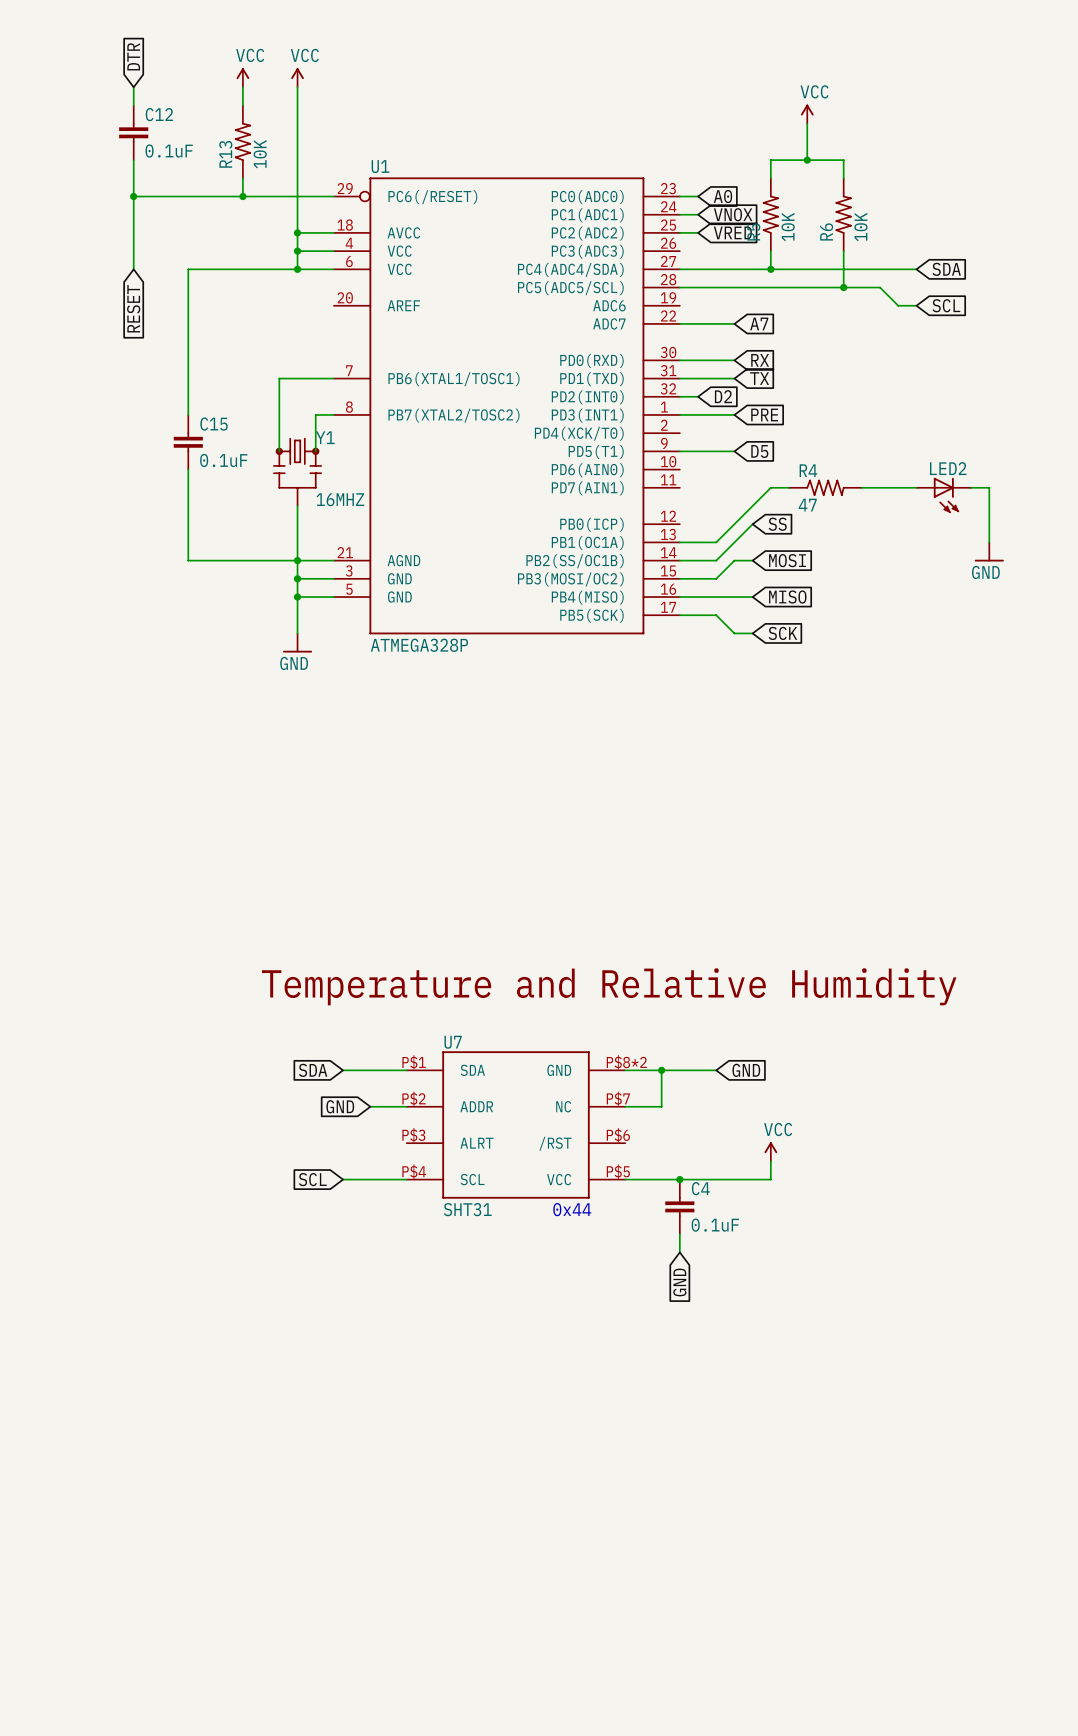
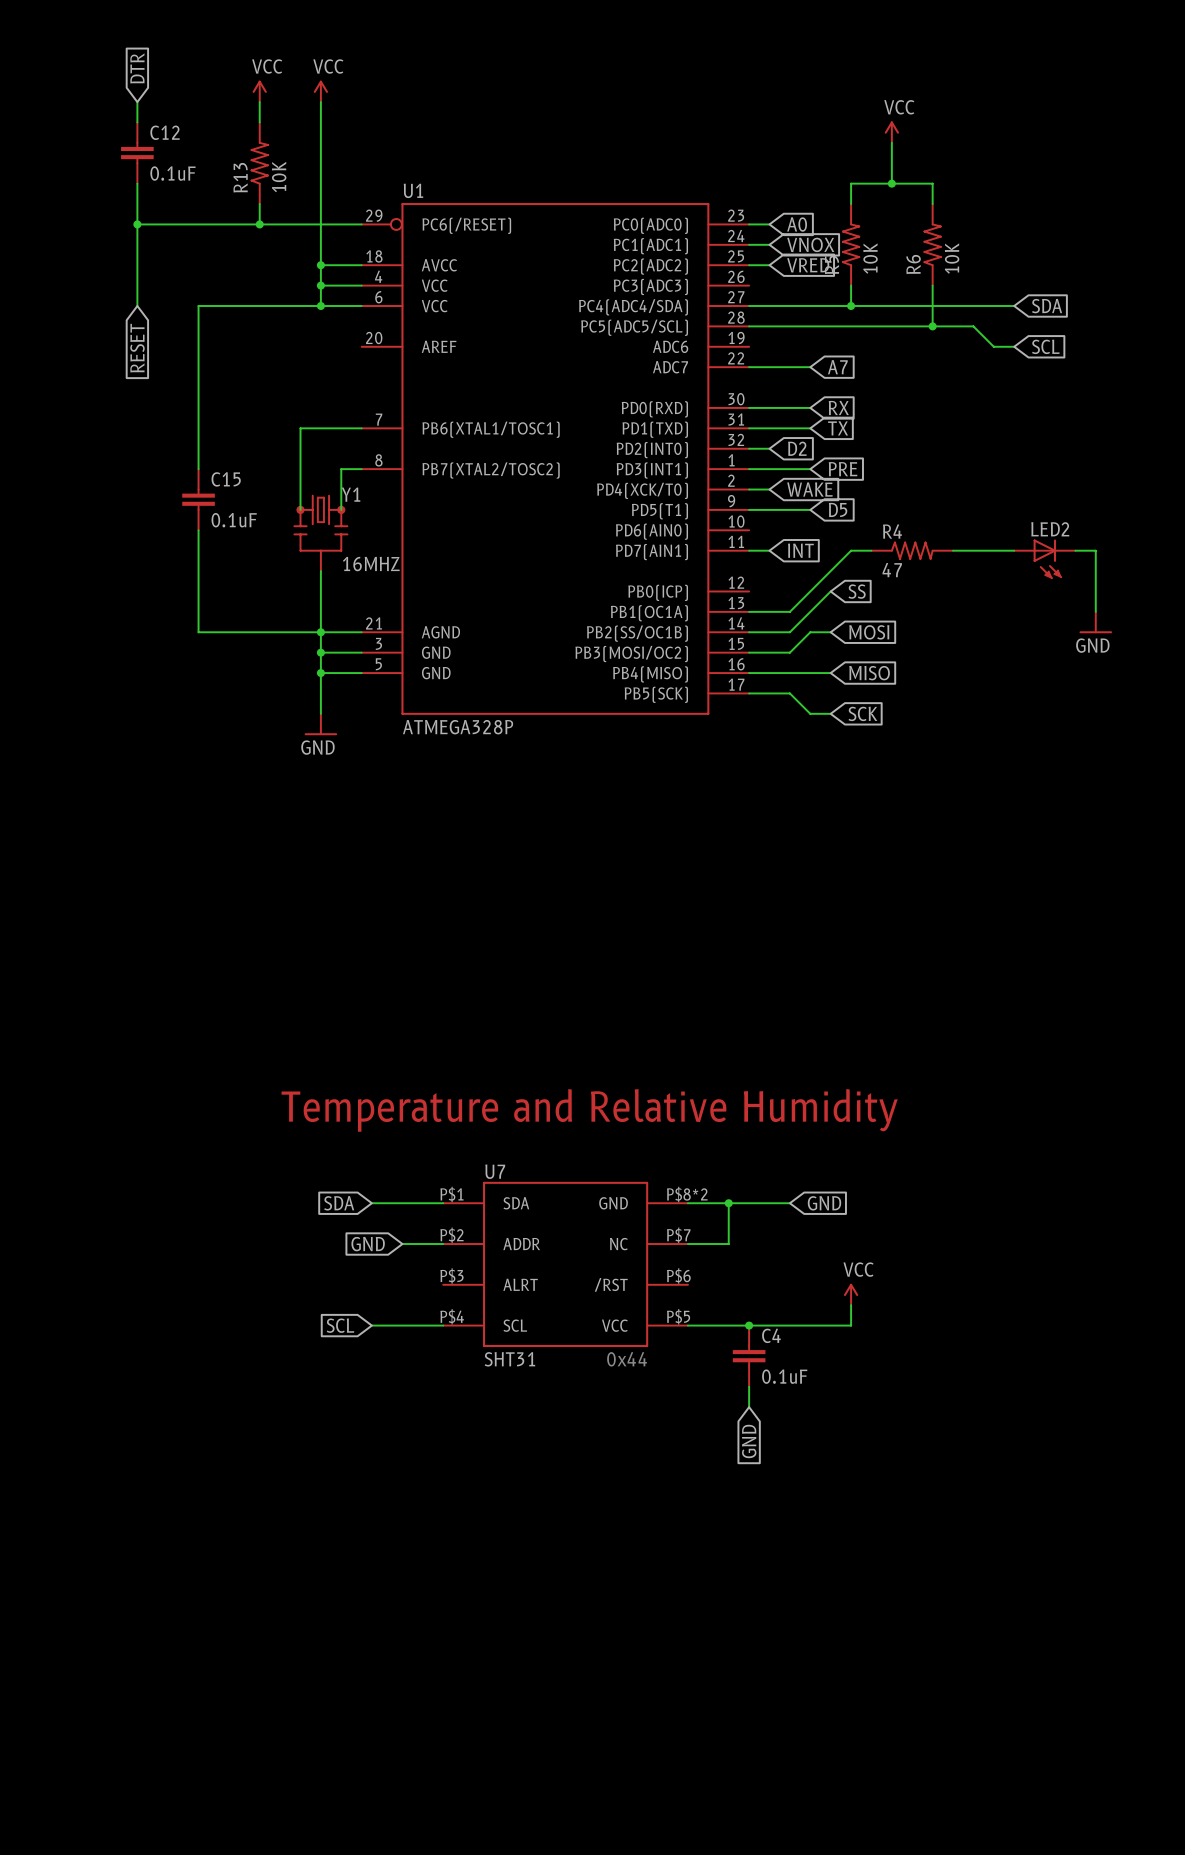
wire: none -> (749, 489) (769, 489)
global label: none -> WAKE (809, 489)
wire: none -> (749, 550) (769, 550)
global label: none -> INT (800, 550)

